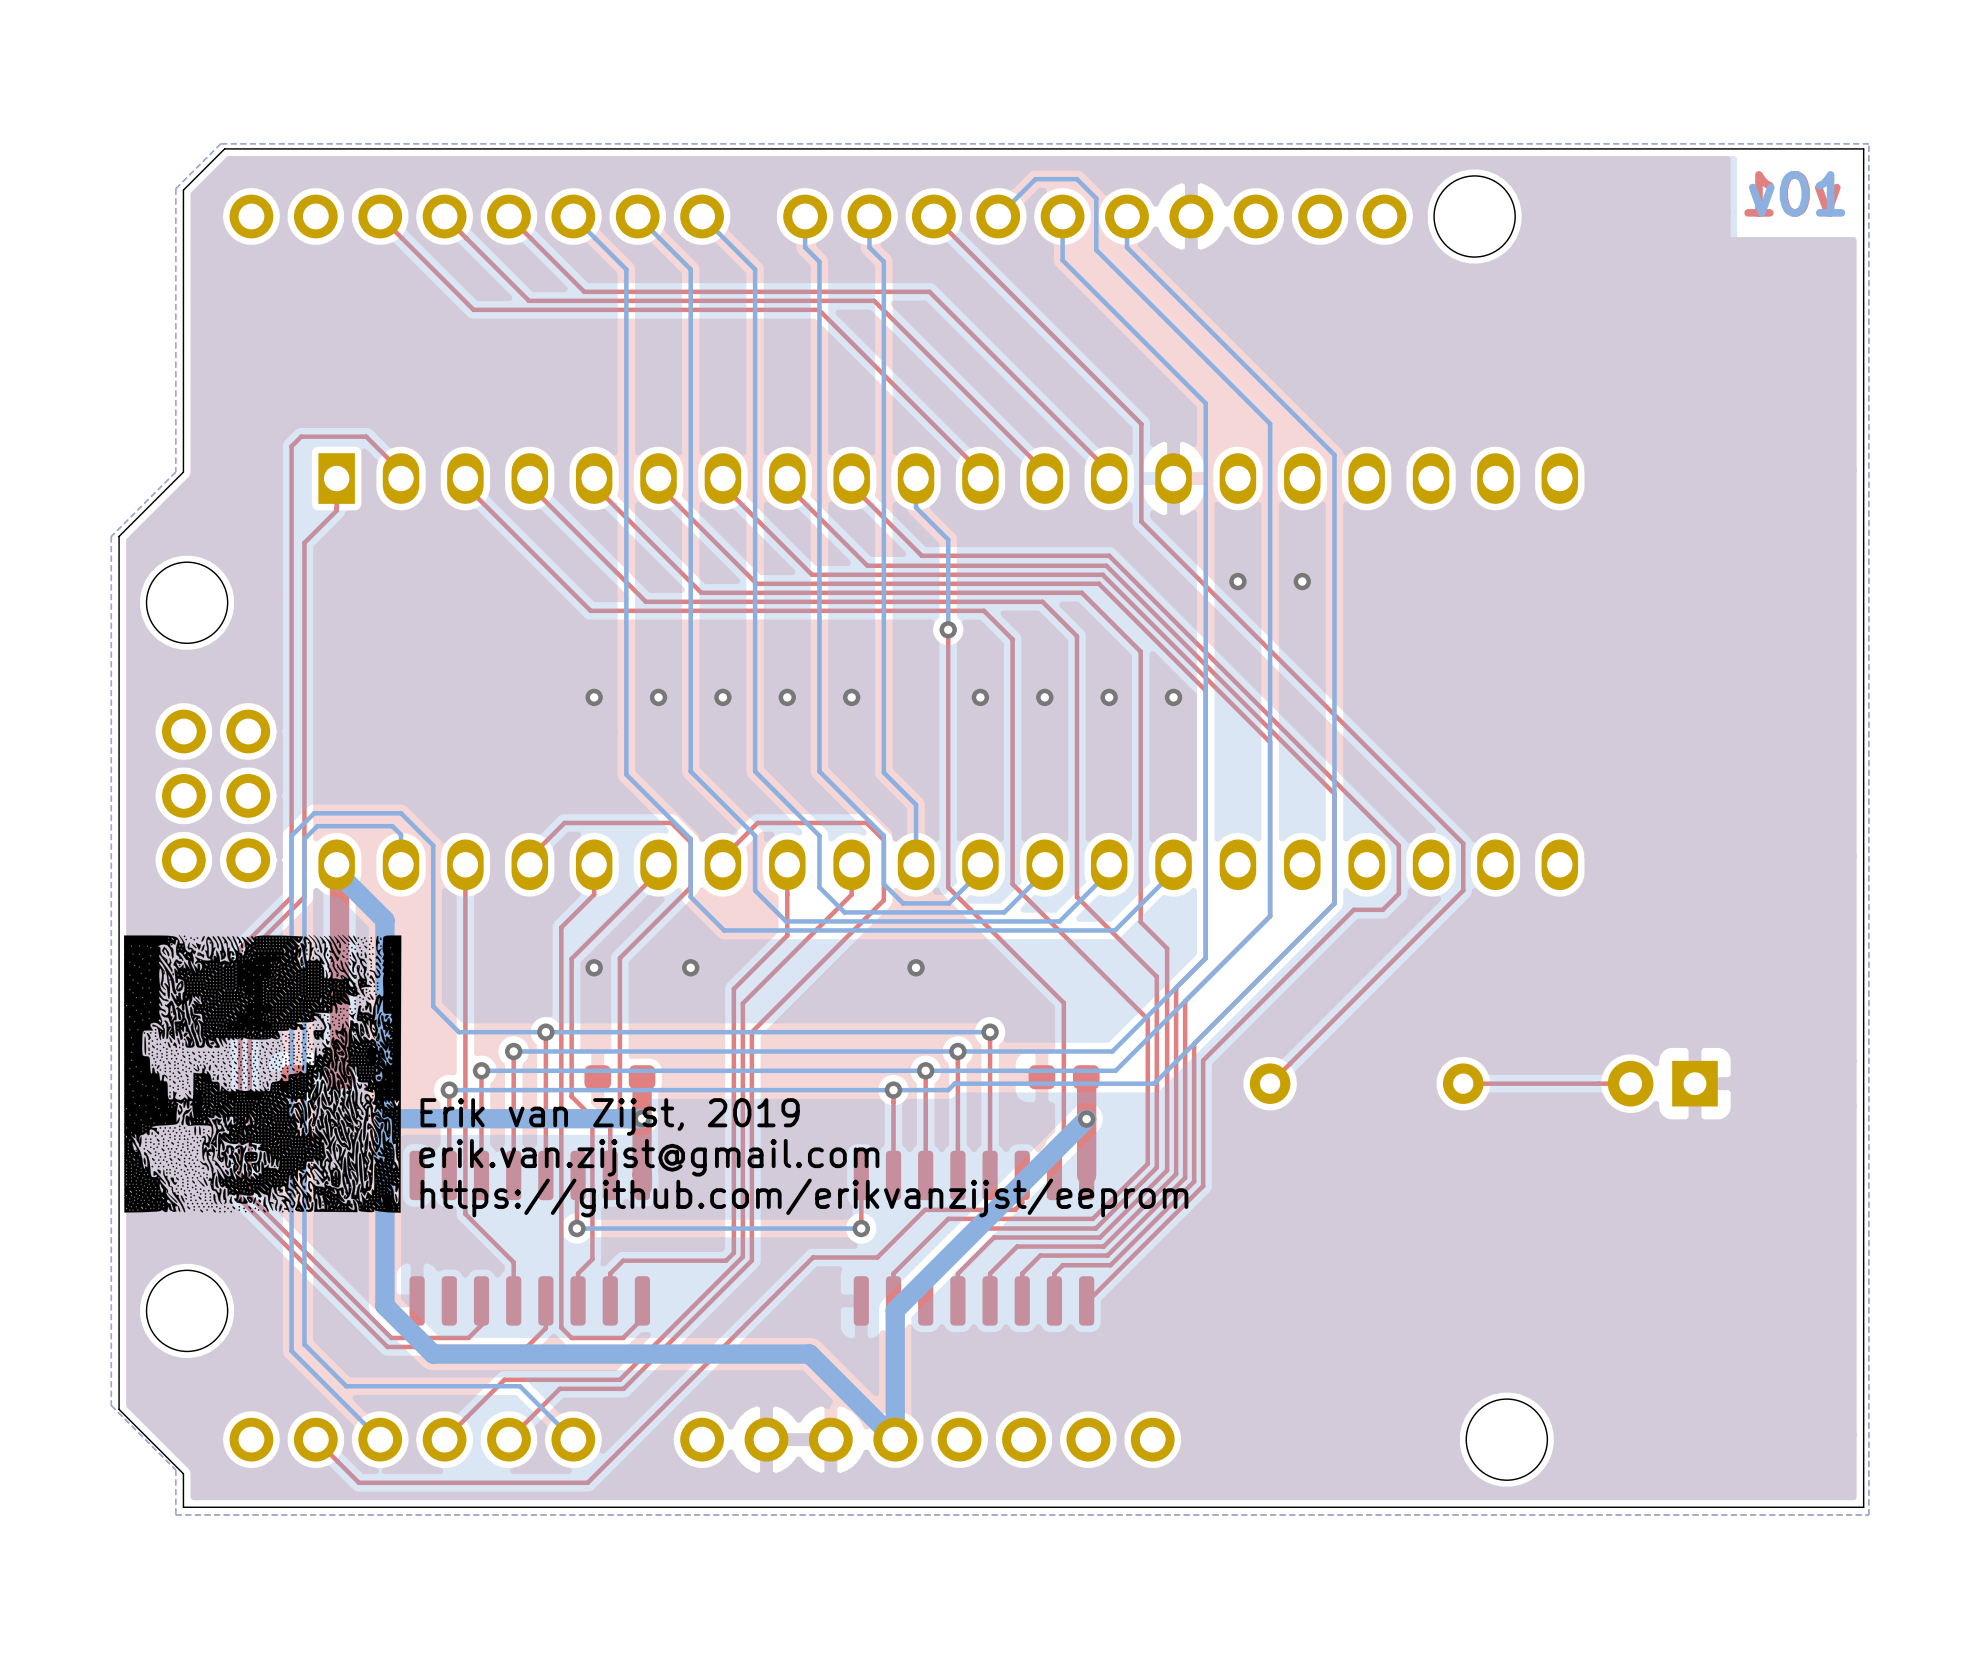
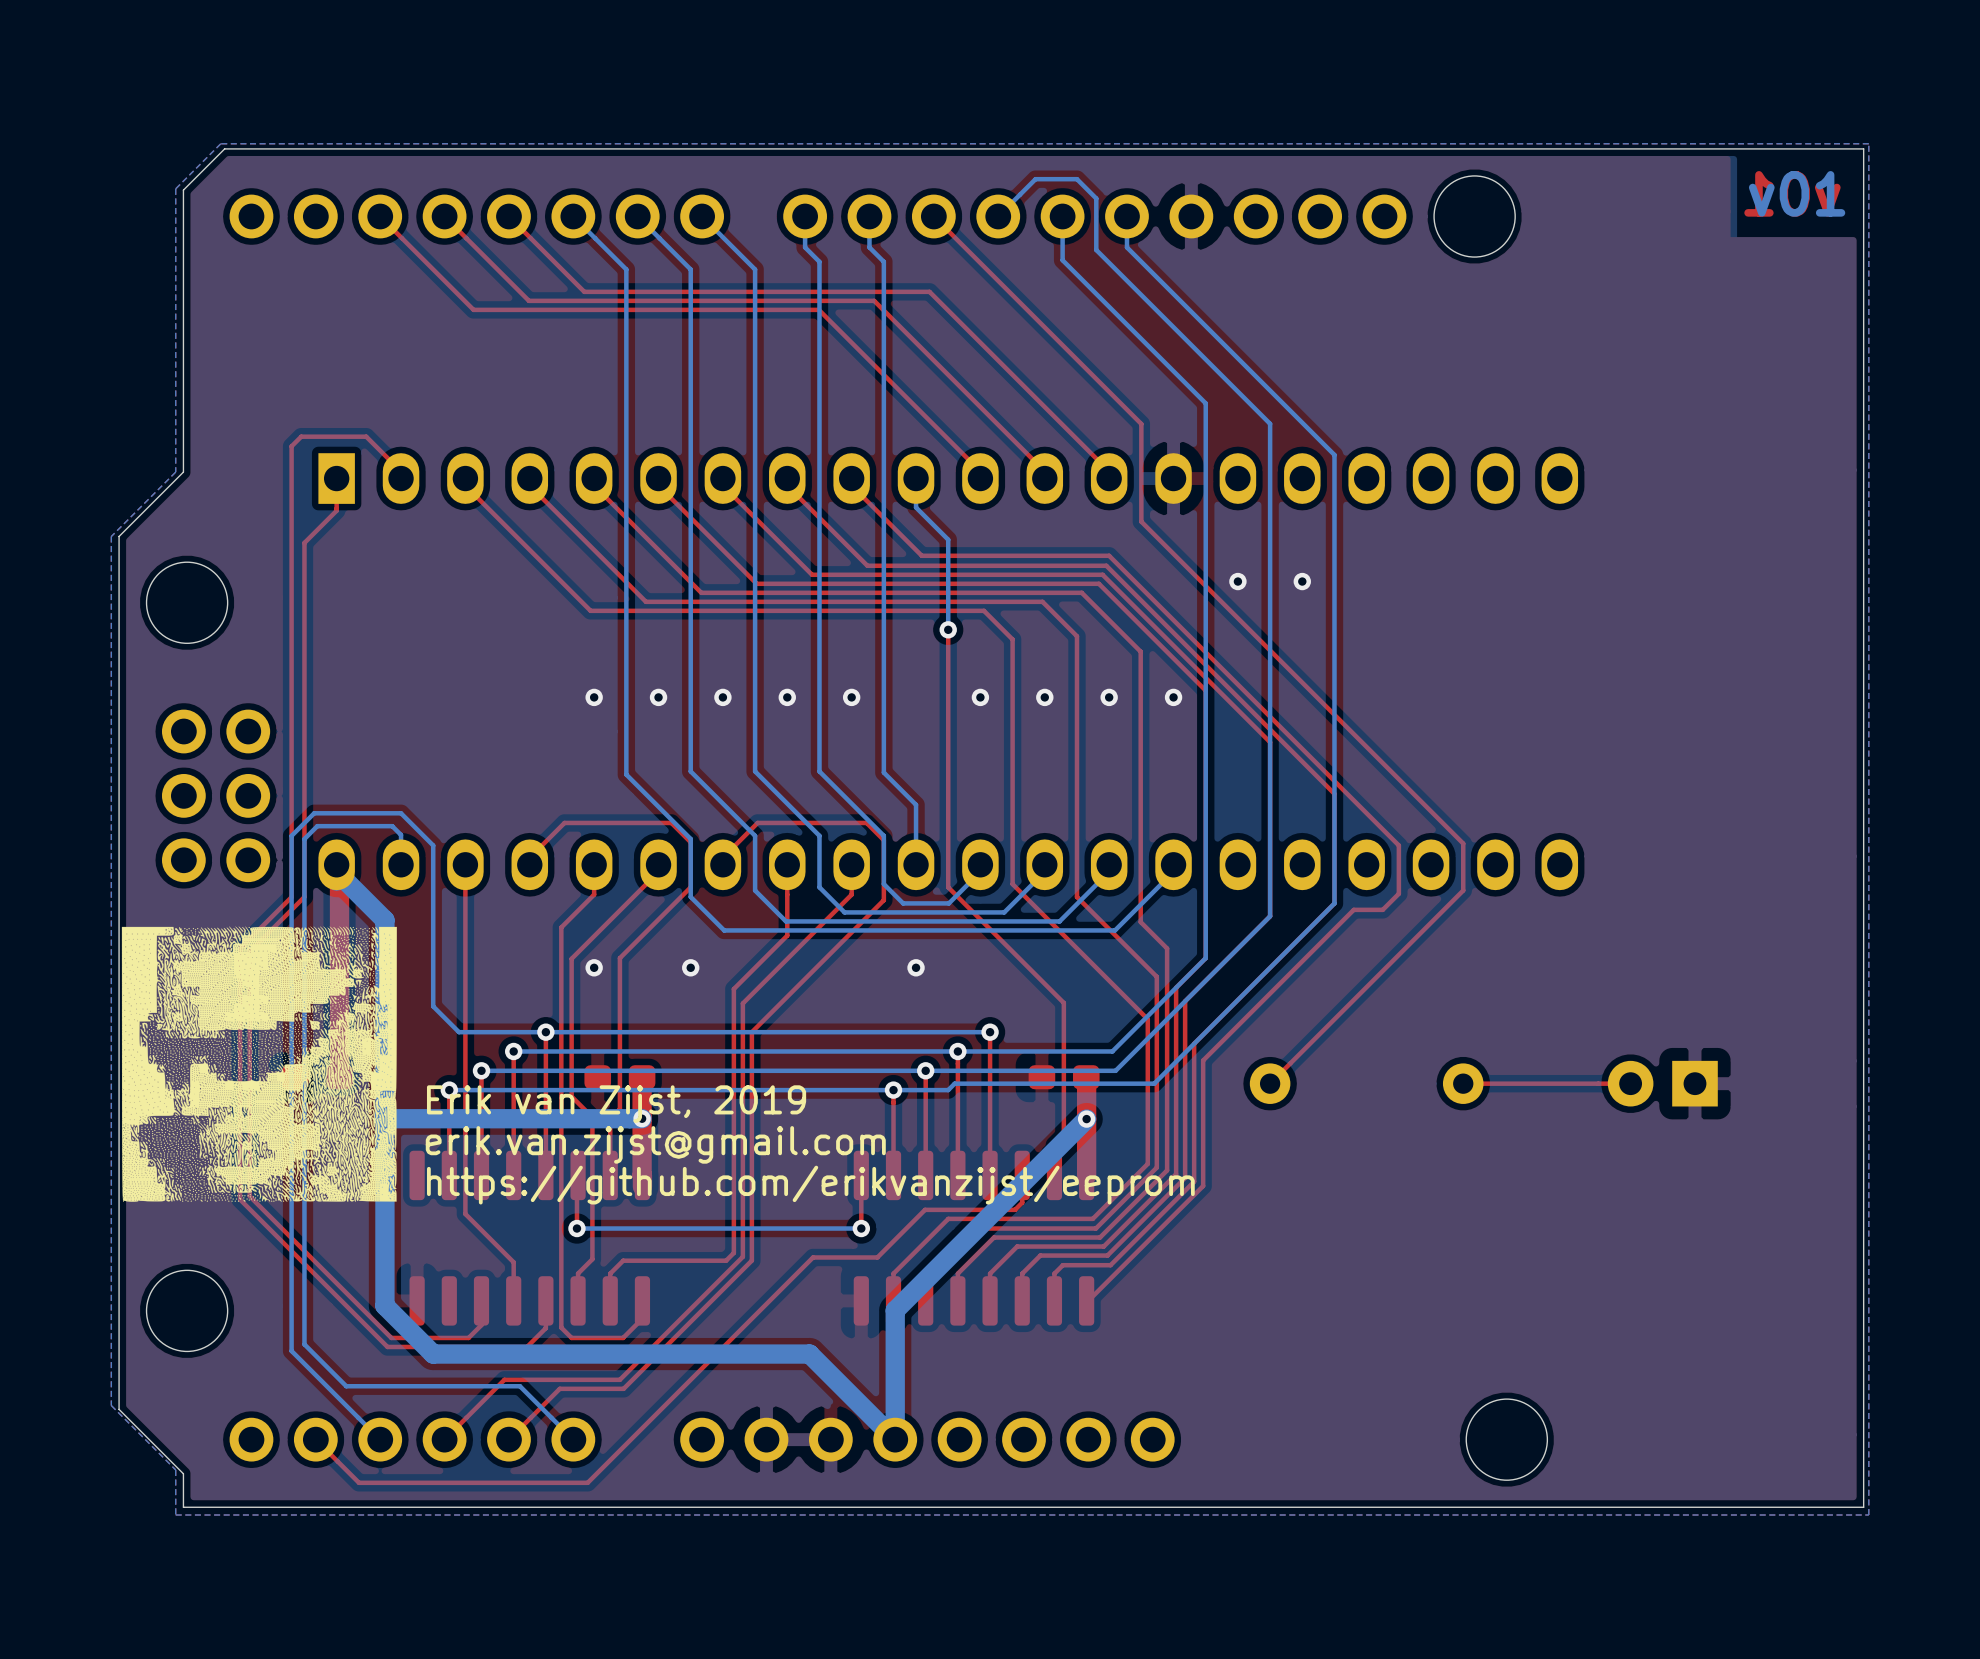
drawing shape: [123, 934, 402, 1213] -> [121, 926, 397, 1202]
text position: Erik van Zijst, 2019 (610, 1116) -> Erik van Zijst, 2019 (616, 1104)
text position: erik.van.zijst@gmail.com (649, 1157) -> erik.van.zijst@gmail.com (655, 1144)
text position: https://github.com/erikvanzijst/eeprom (804, 1197) -> https://github.com/erikvanzijst/eeprom (810, 1185)

